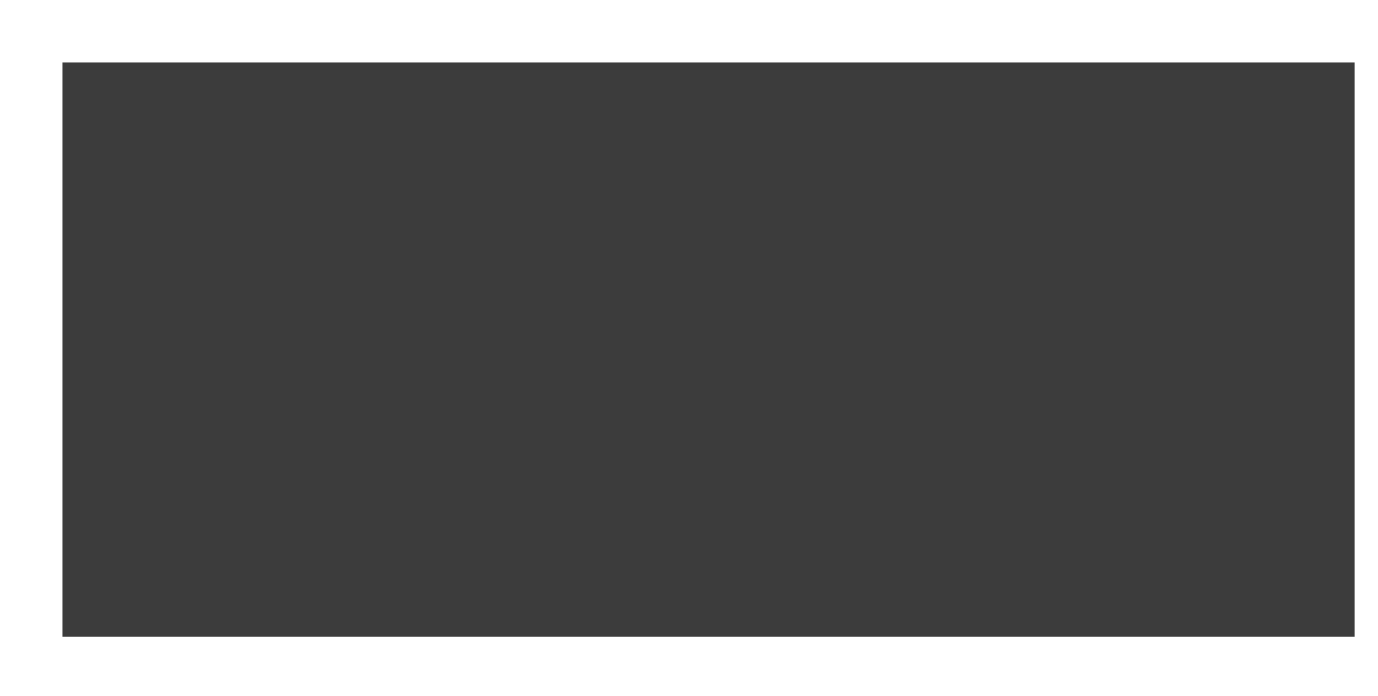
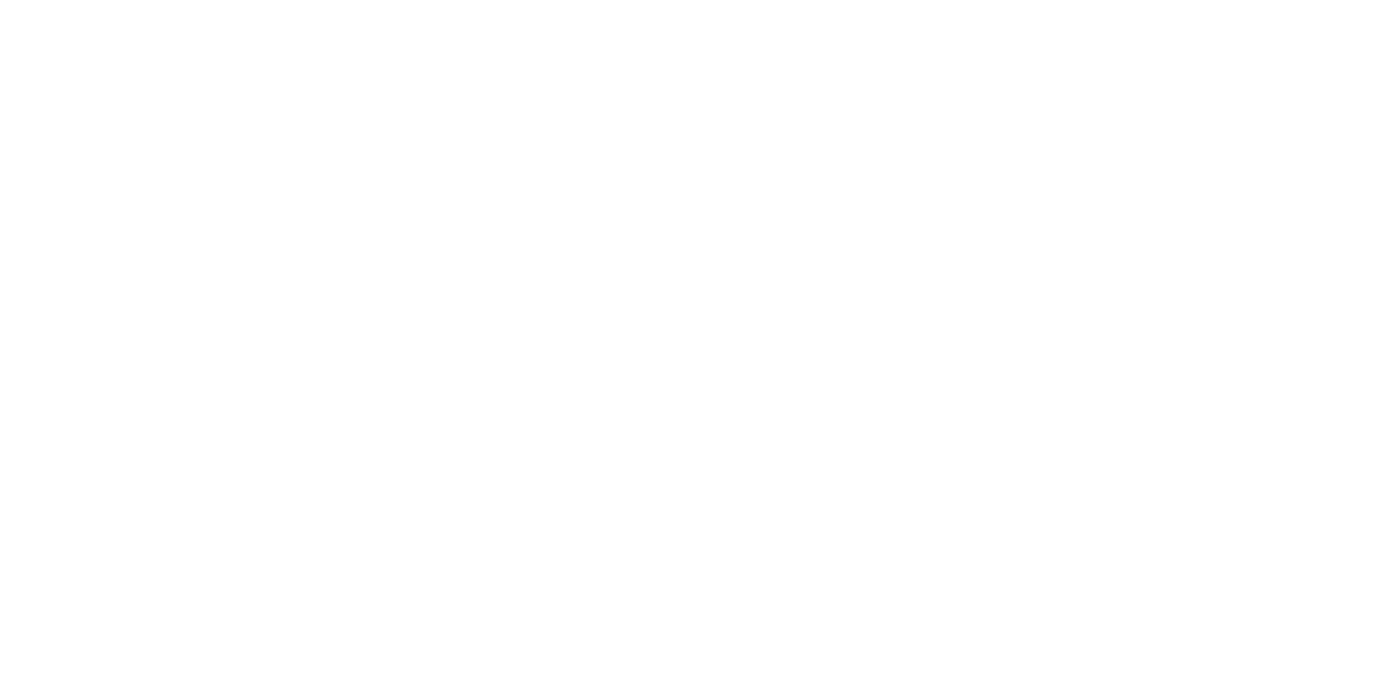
drawing: [62, 62, 1355, 637] -> none

